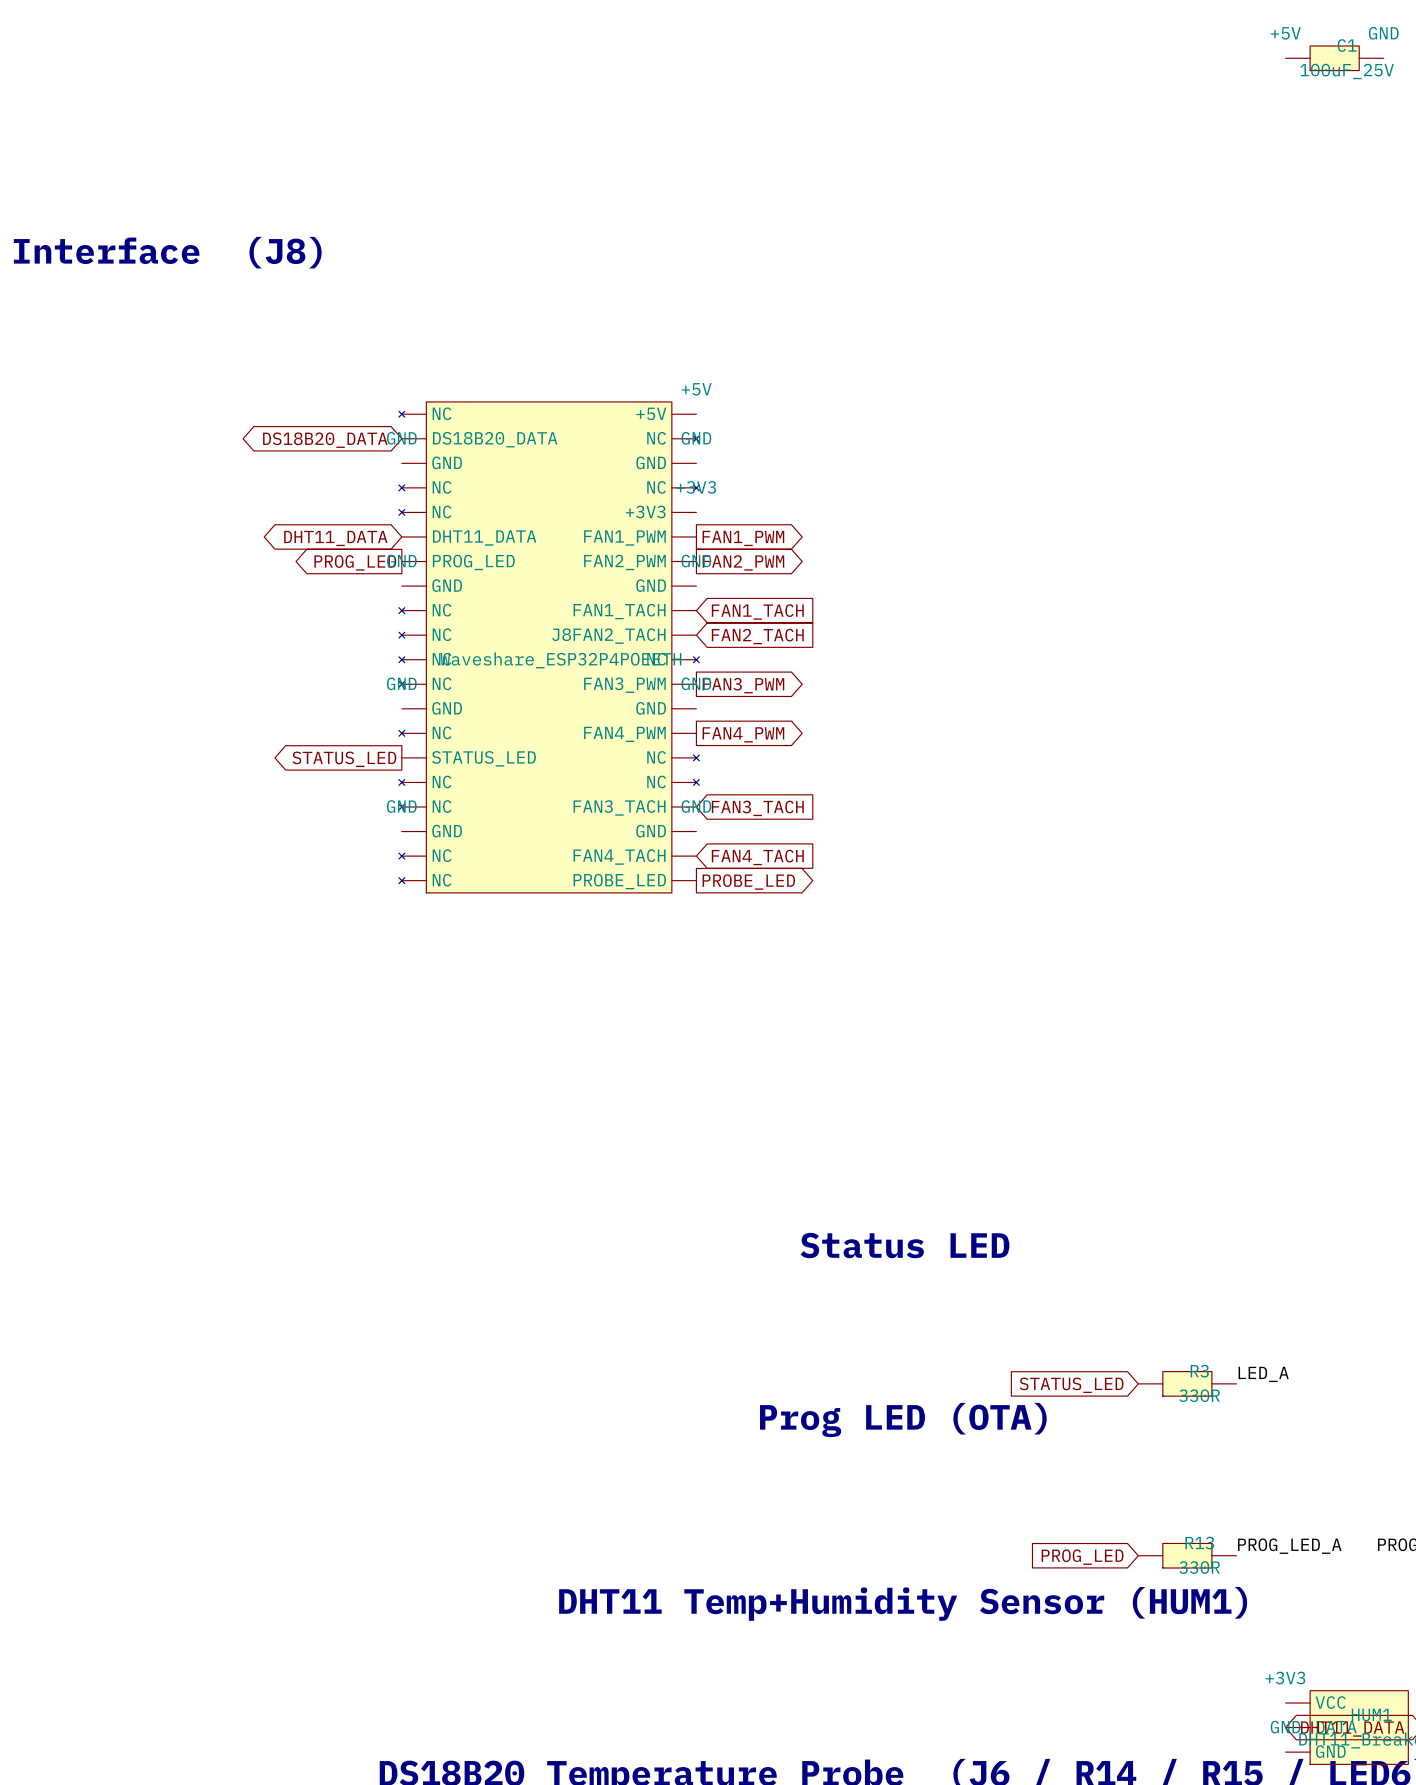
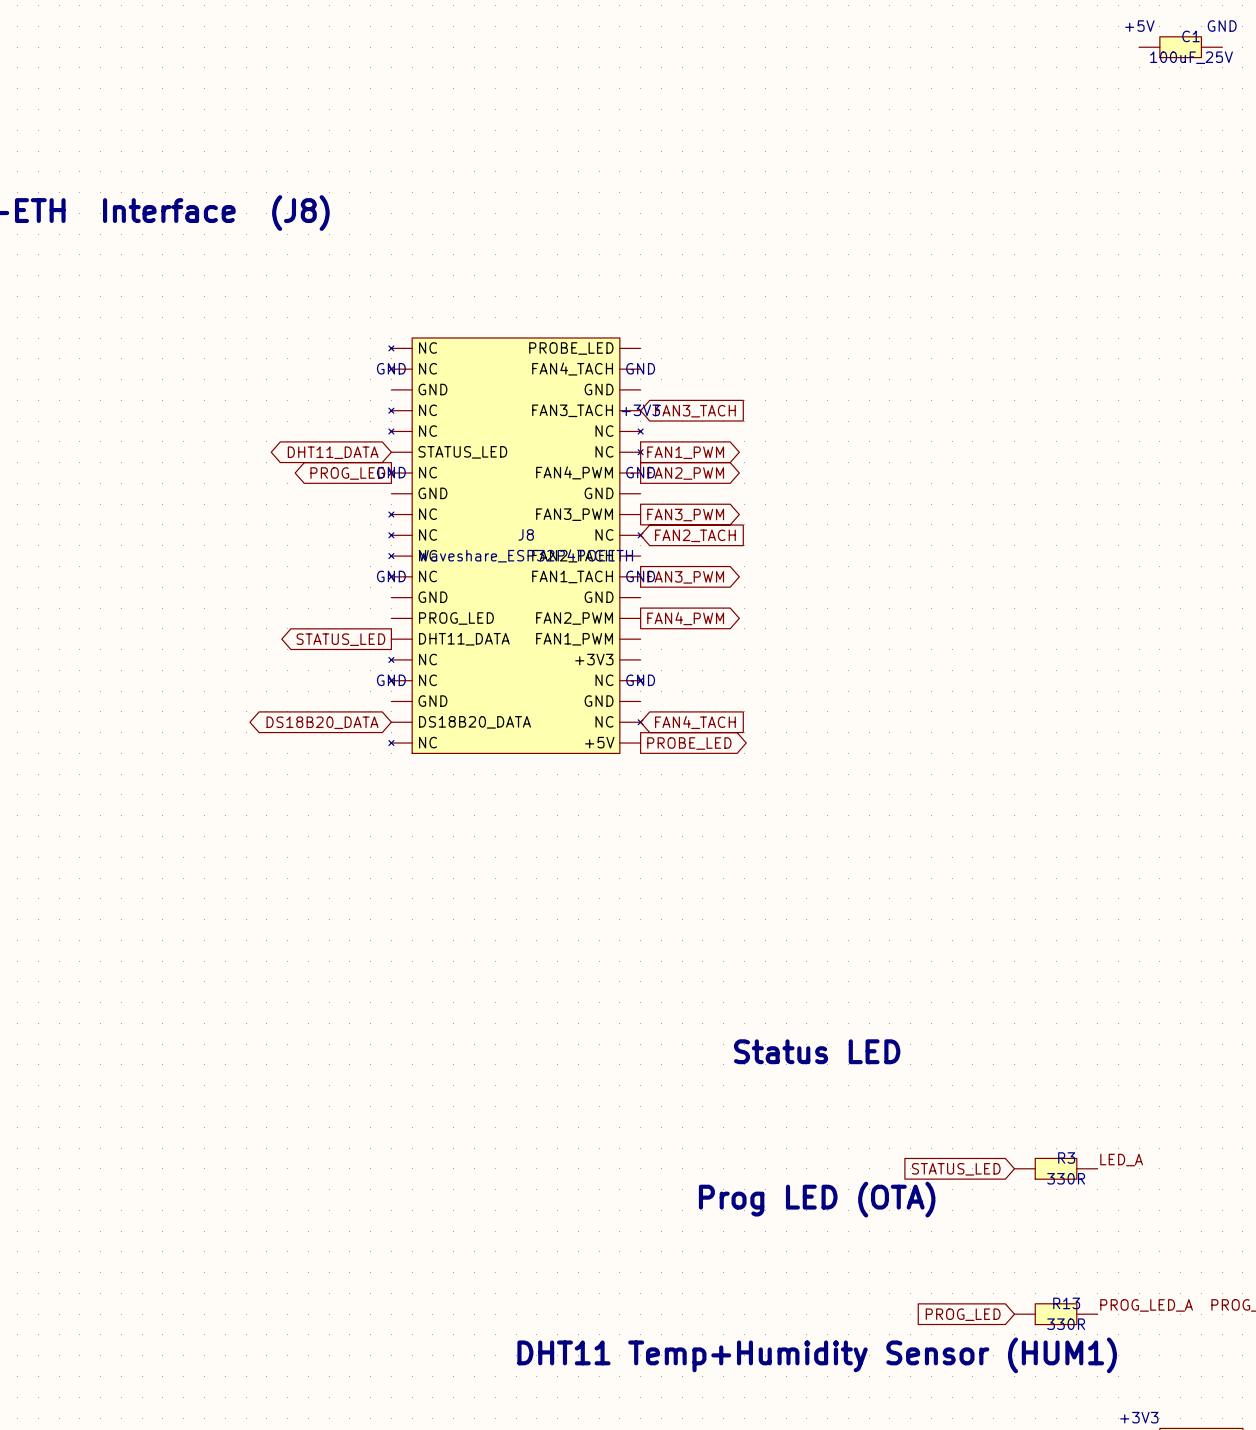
power symbol: +5V (696, 389) -> none
global label: DS18B20_DATA (325, 440) -> none
global label: none -> FAN3_TACH (695, 411)
global label shape: input (757, 612) -> output (685, 515)
global label: FAN1_TACH (757, 612) -> FAN3_PWM (685, 515)
J8 flip: as is (549, 647) -> up-down (516, 545)
global label: FAN3_TACH (757, 808) -> none
global label: none -> DS18B20_DATA (322, 722)

